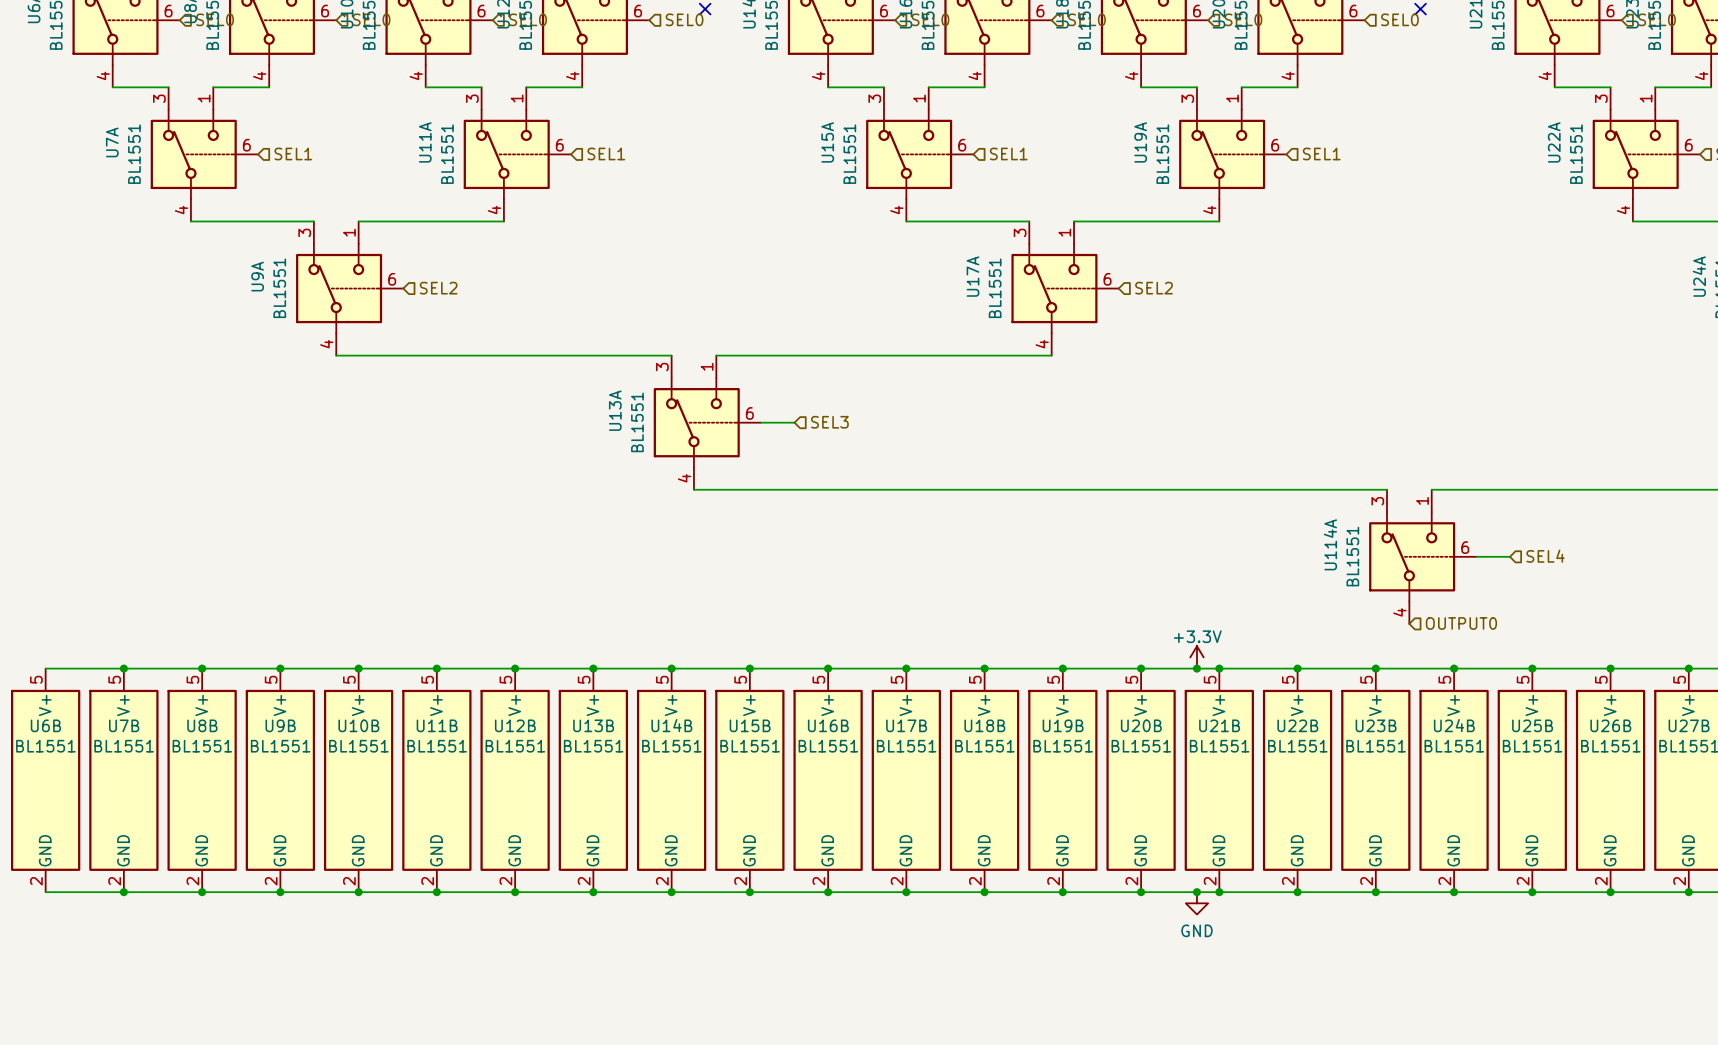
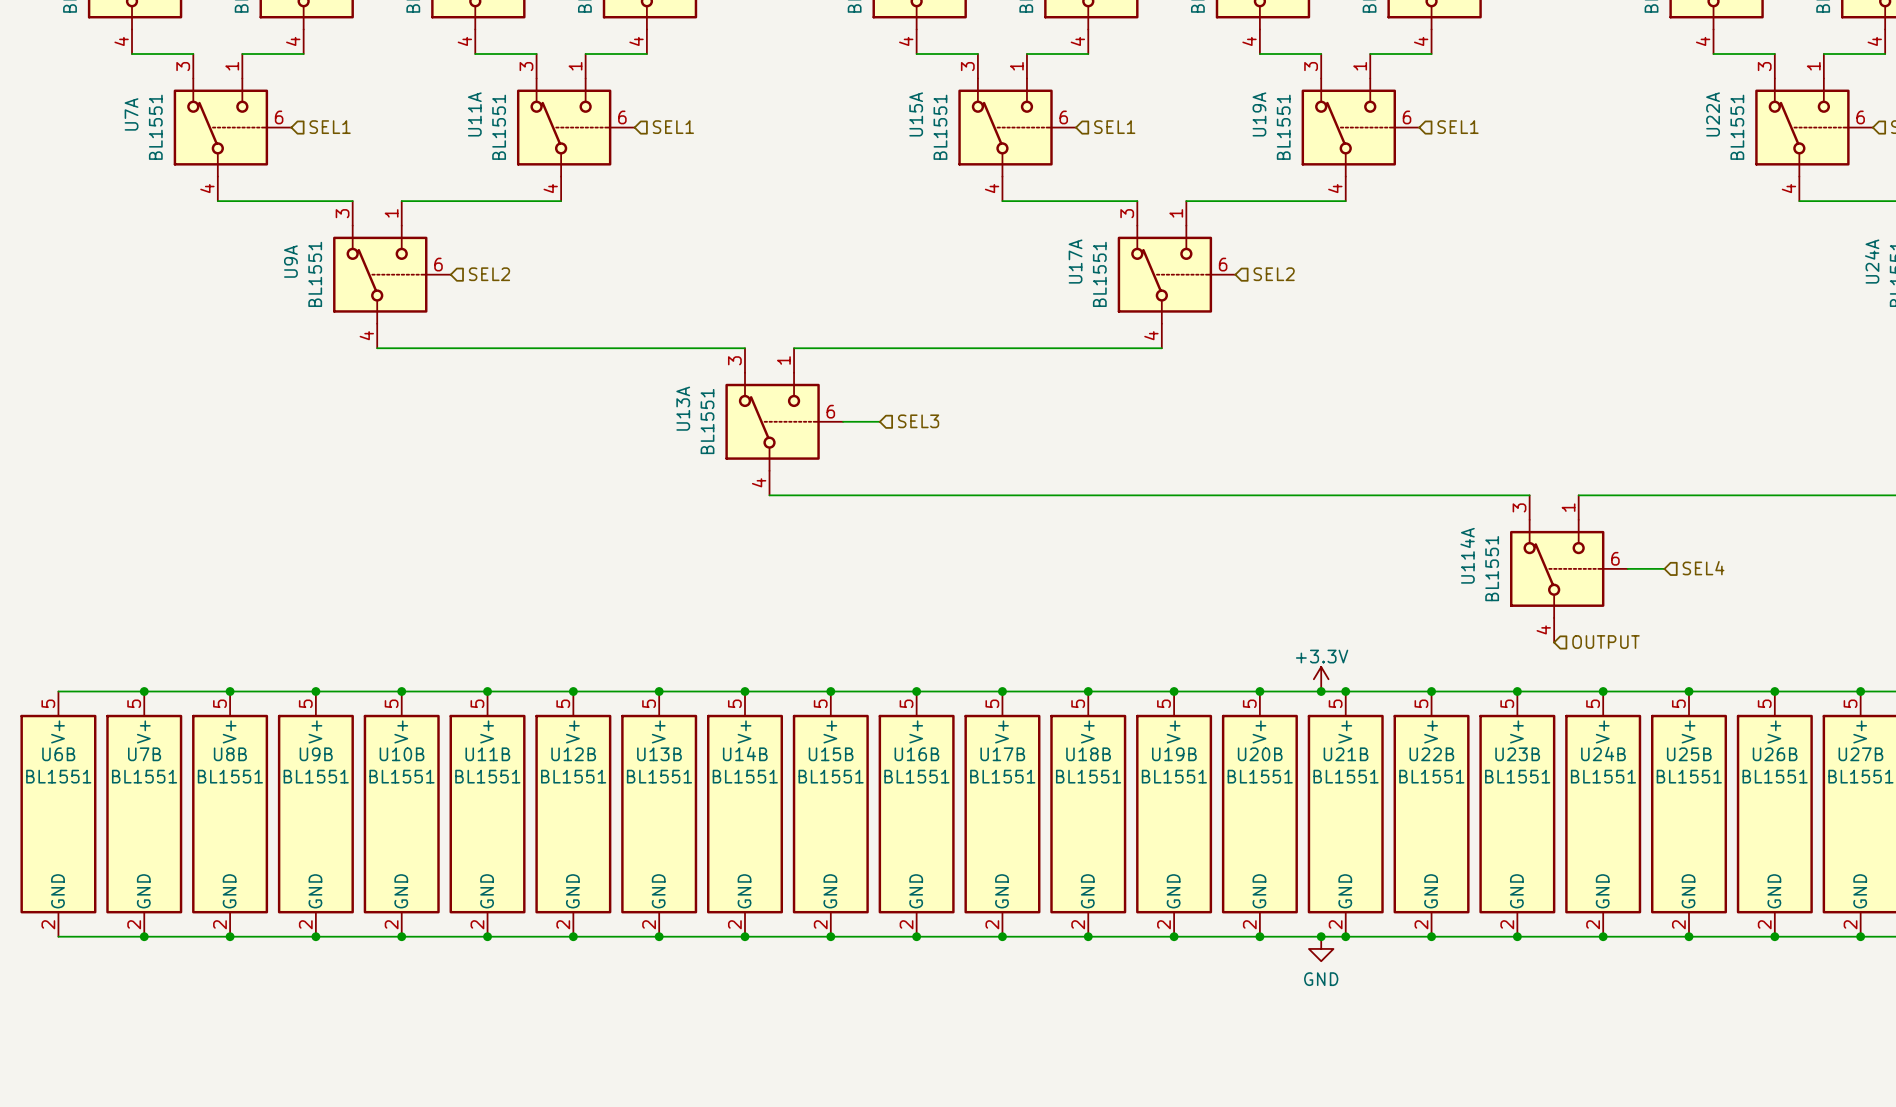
hierarchical label: OUTPUT0 (1461, 623) -> OUTPUT (1606, 642)

